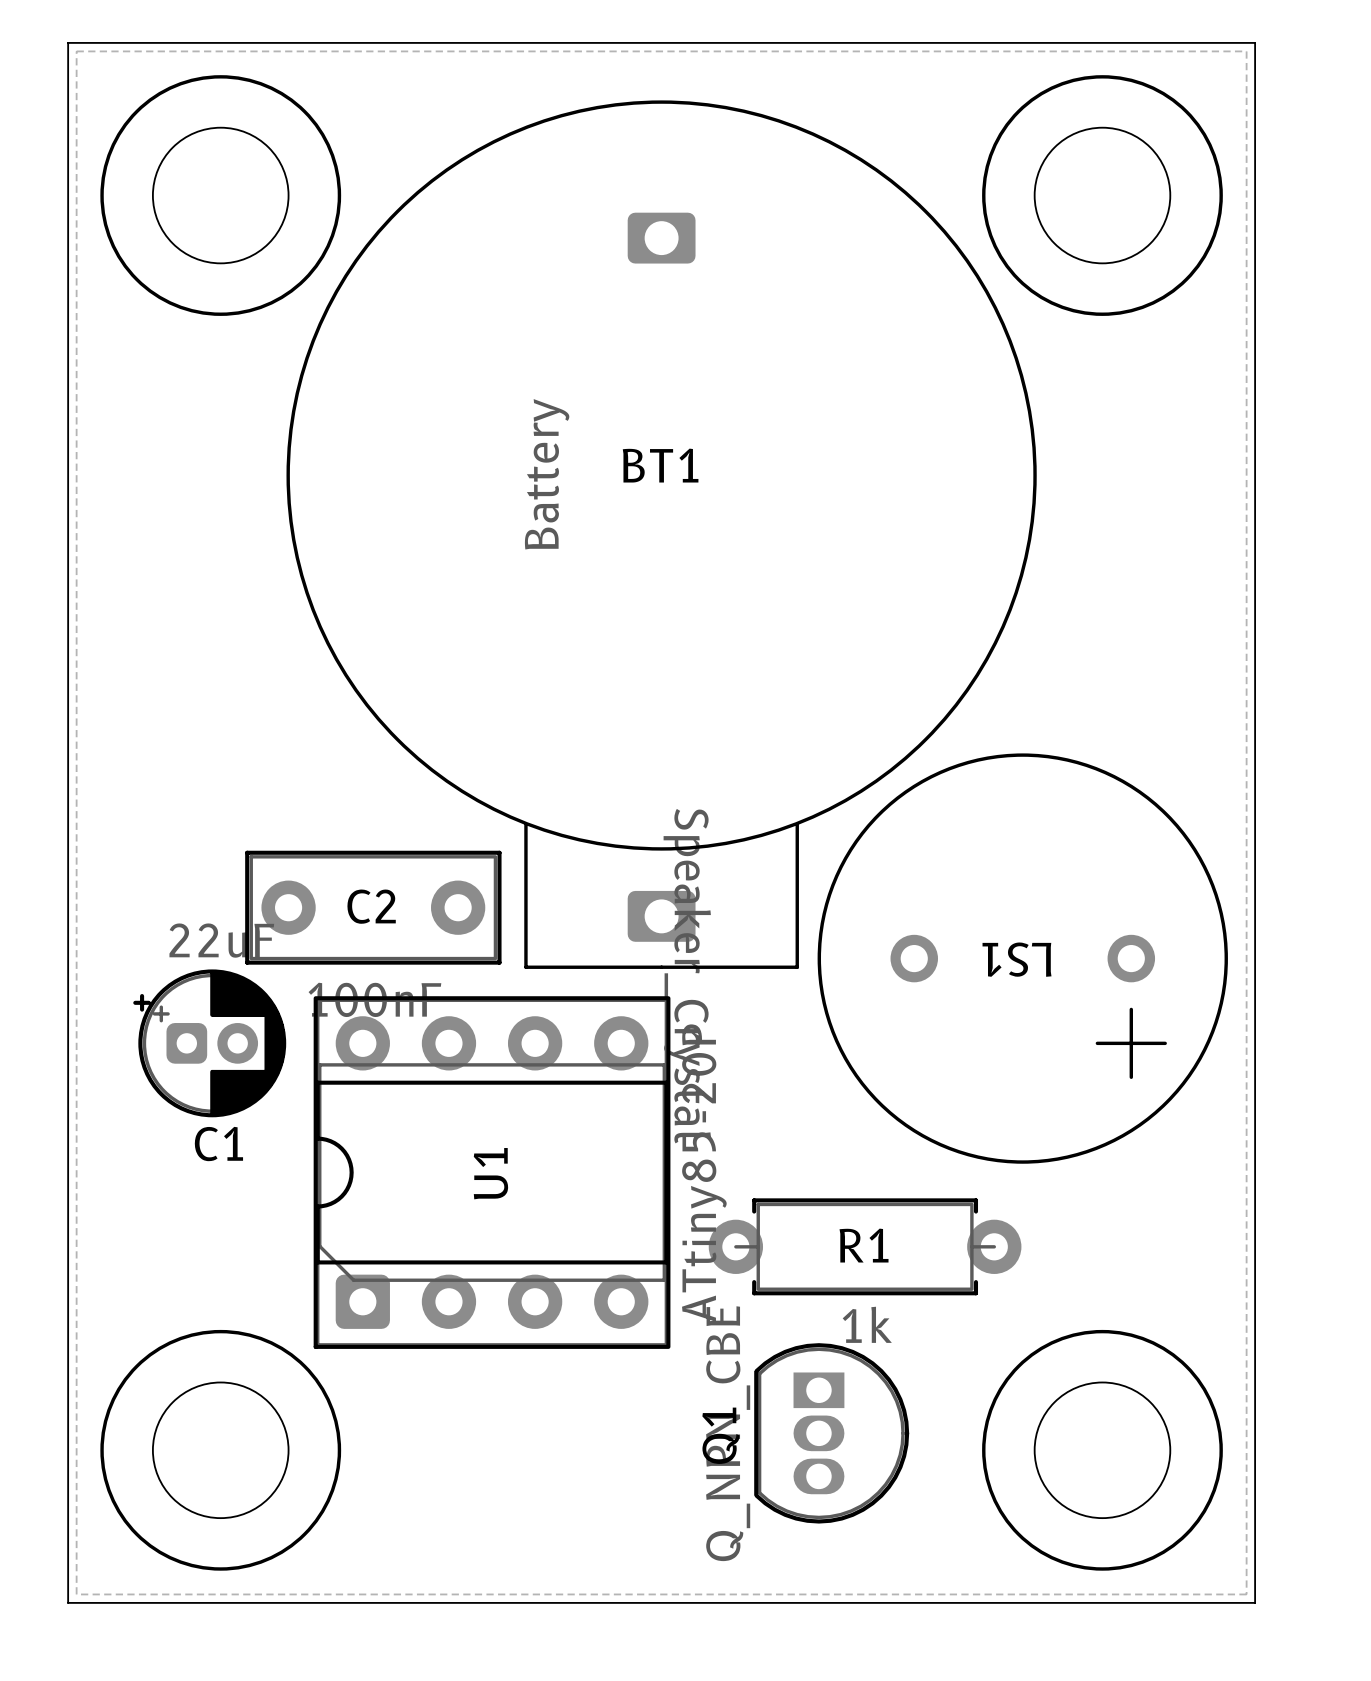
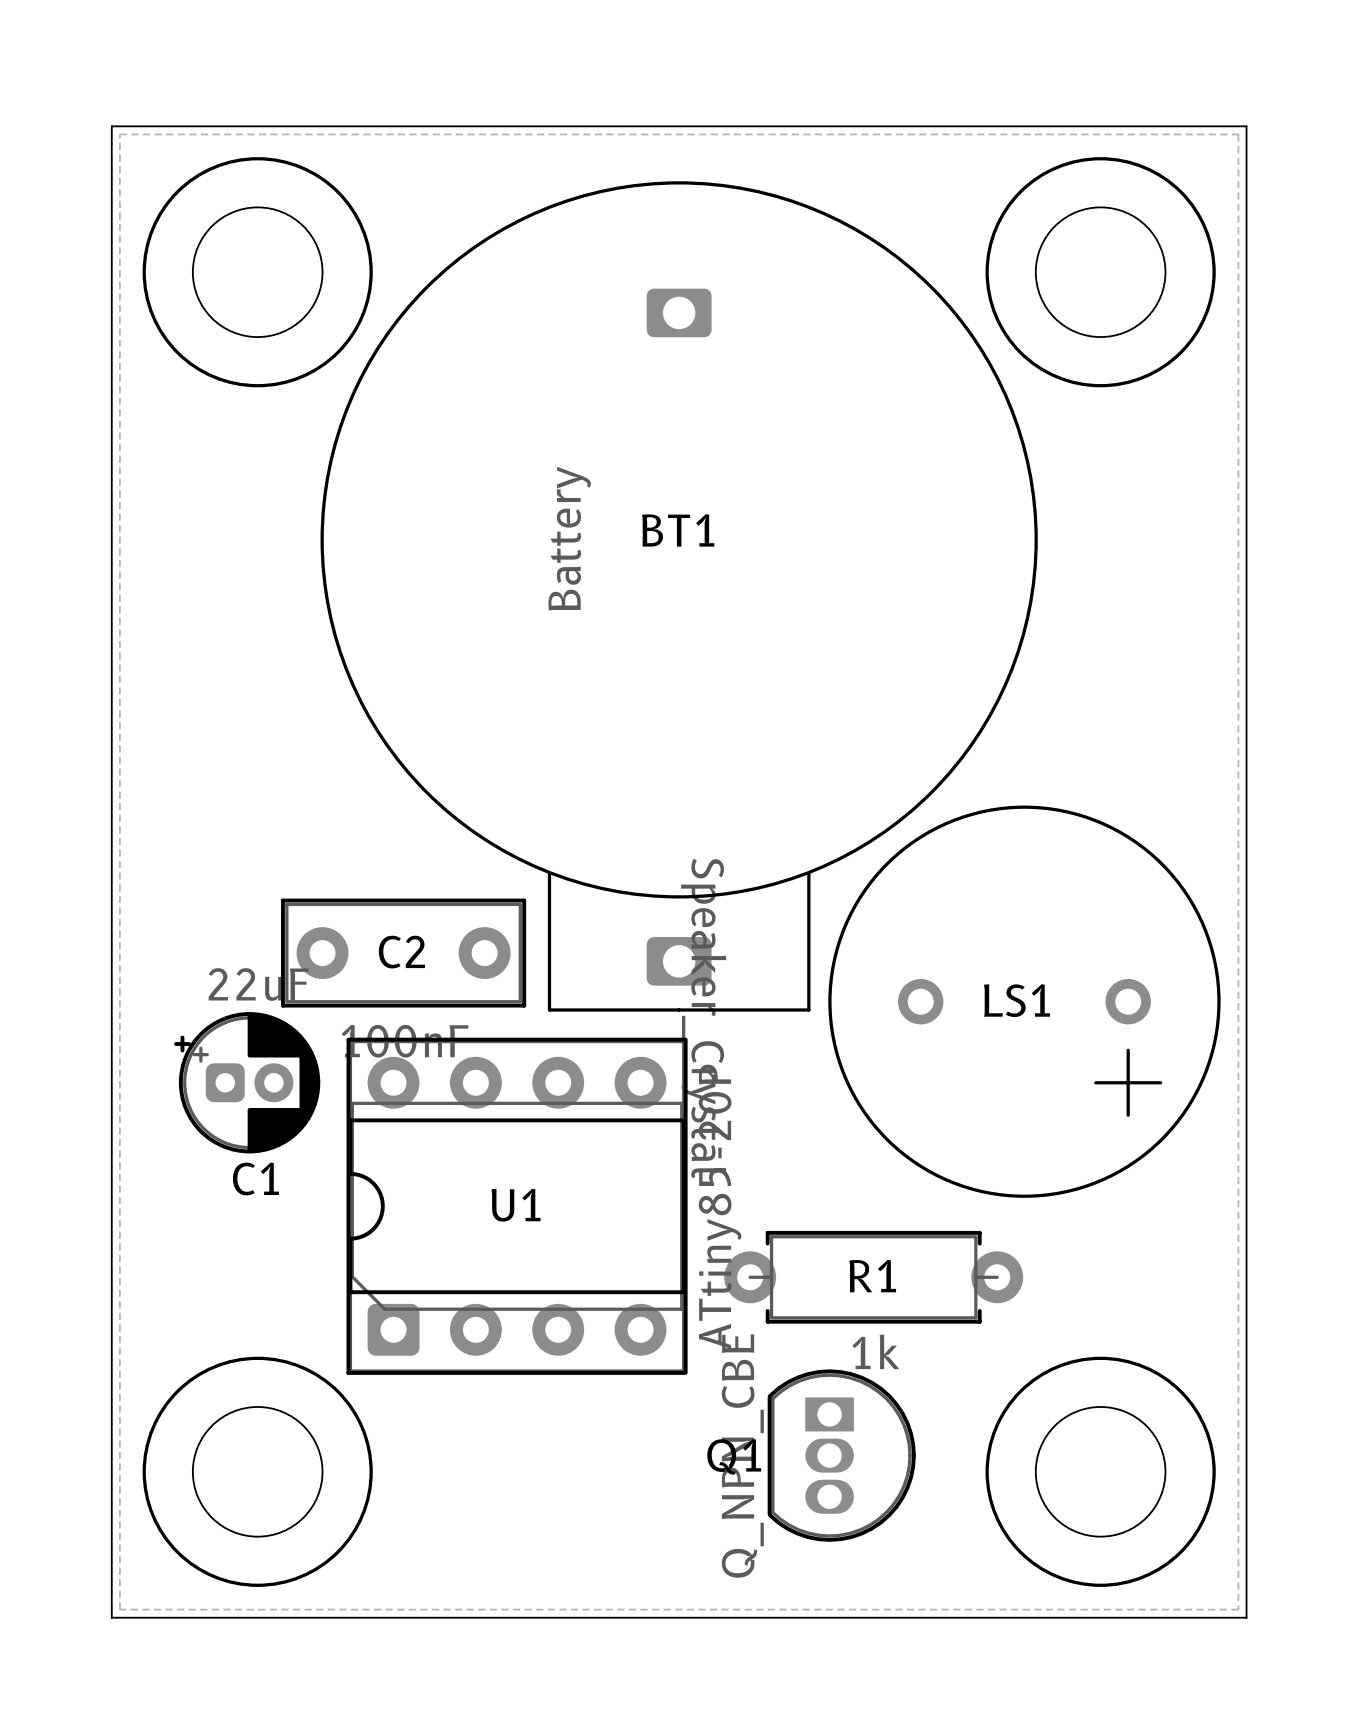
LS1 name rotation: 0° (1017, 959) -> 180° (1017, 1000)
U1 name rotation: 0° (490, 1173) -> 90° clockwise (515, 1205)
Q1 name rotation: 0° (720, 1435) -> 90° clockwise (734, 1456)

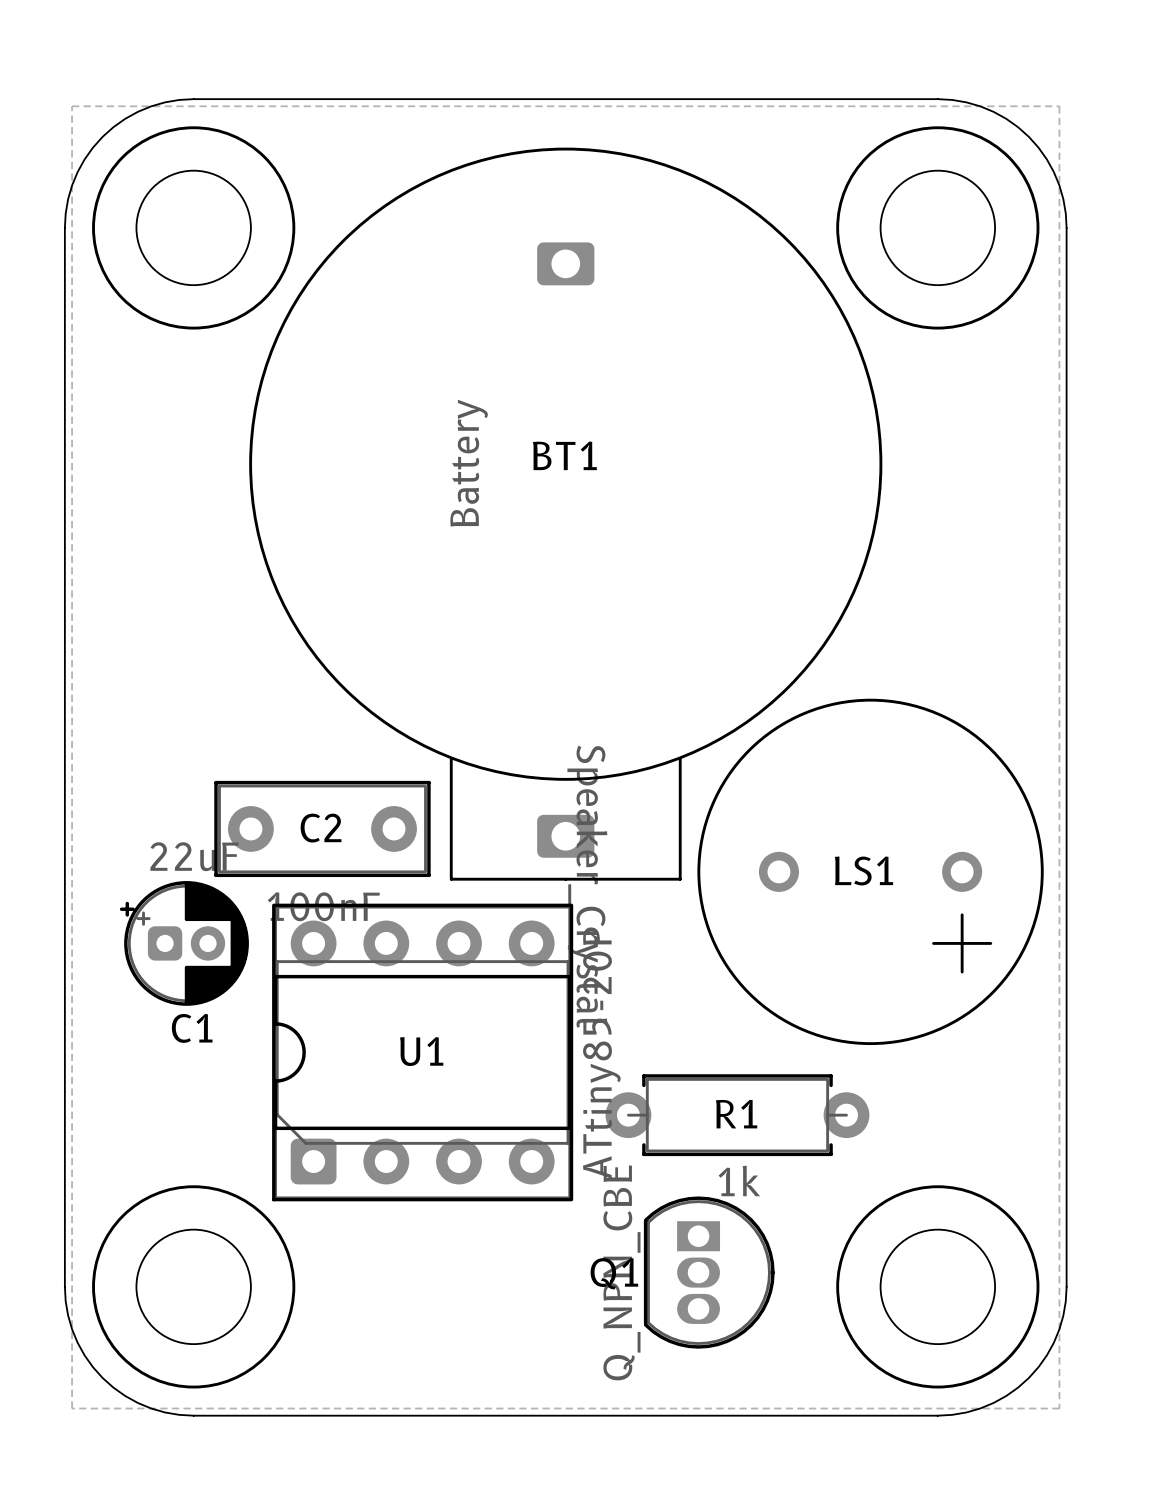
board edge: (257, 126) (111, 126) (111, 272) -> (193, 99) (179, 99) (151, 106) (125, 118) (102, 136) (84, 159) (77, 172) (68, 199) (64, 227)
board edge: (1100, 126) (1246, 126) (1246, 272) -> (937, 99) (966, 102) (993, 111) (1018, 127) (1028, 136) (1046, 159) (1059, 185) (1065, 213) (1066, 227)
board edge: (111, 1471) (111, 1617) (257, 1617) -> (64, 1286) (68, 1315) (77, 1342) (92, 1367) (102, 1377) (125, 1395) (151, 1408) (179, 1414) (193, 1415)
board edge: (1246, 1471) (1246, 1617) (1100, 1617) -> (1066, 1286) (1063, 1315) (1053, 1342) (1046, 1355) (1028, 1377) (1006, 1395) (993, 1402) (966, 1412) (937, 1415)

